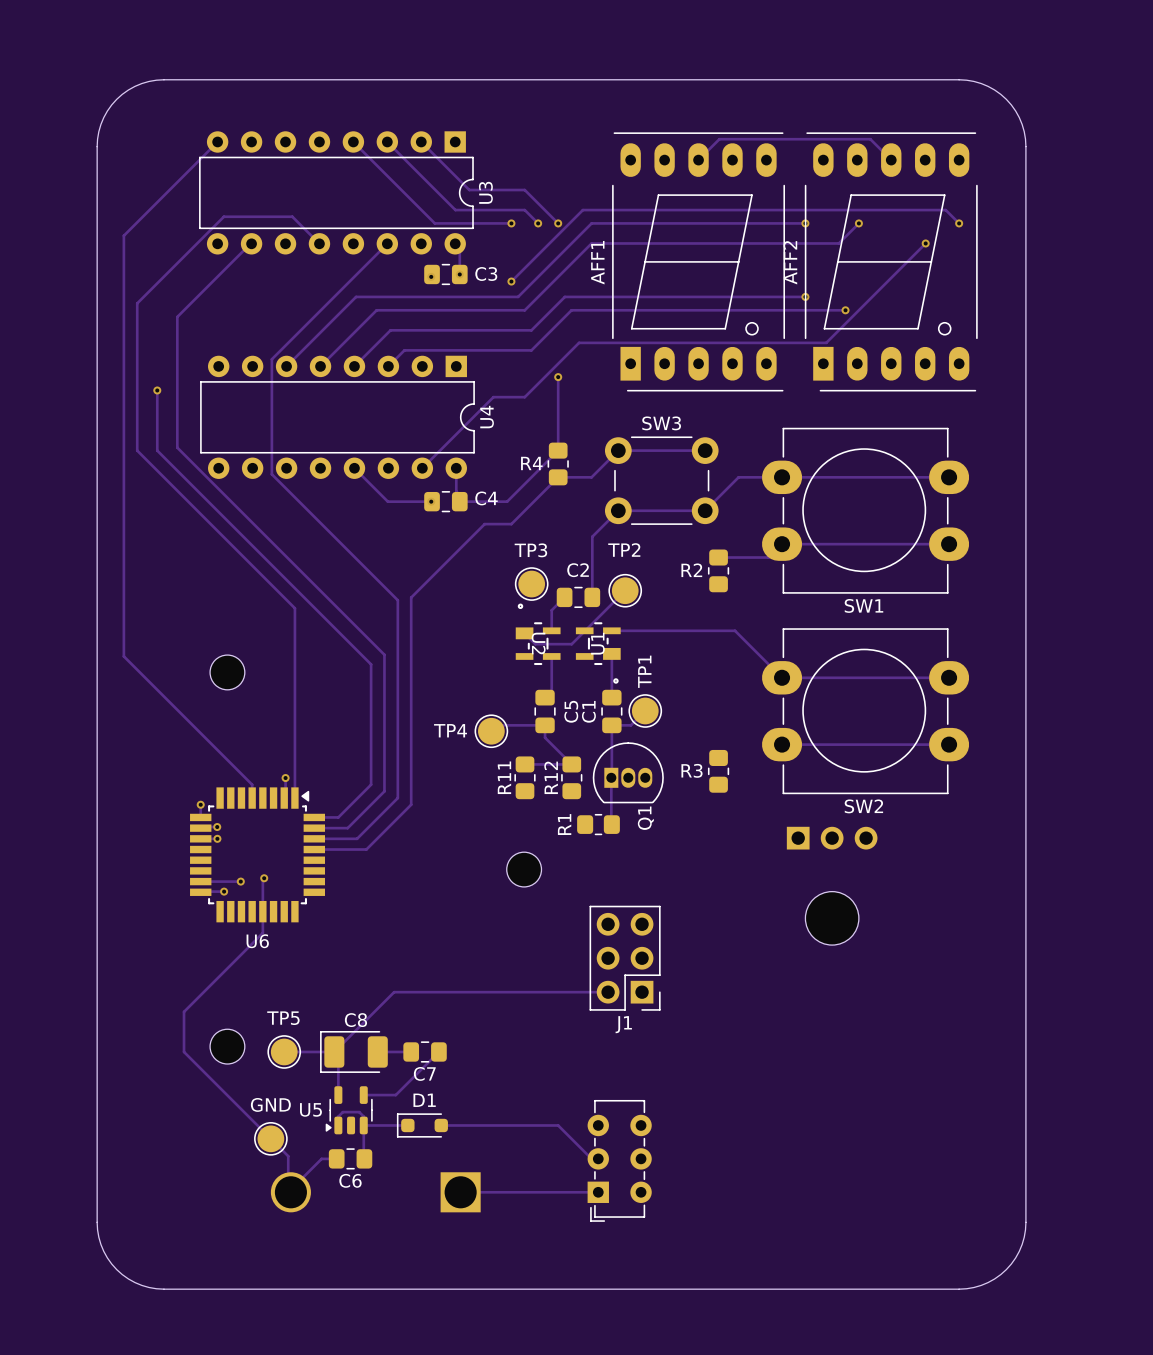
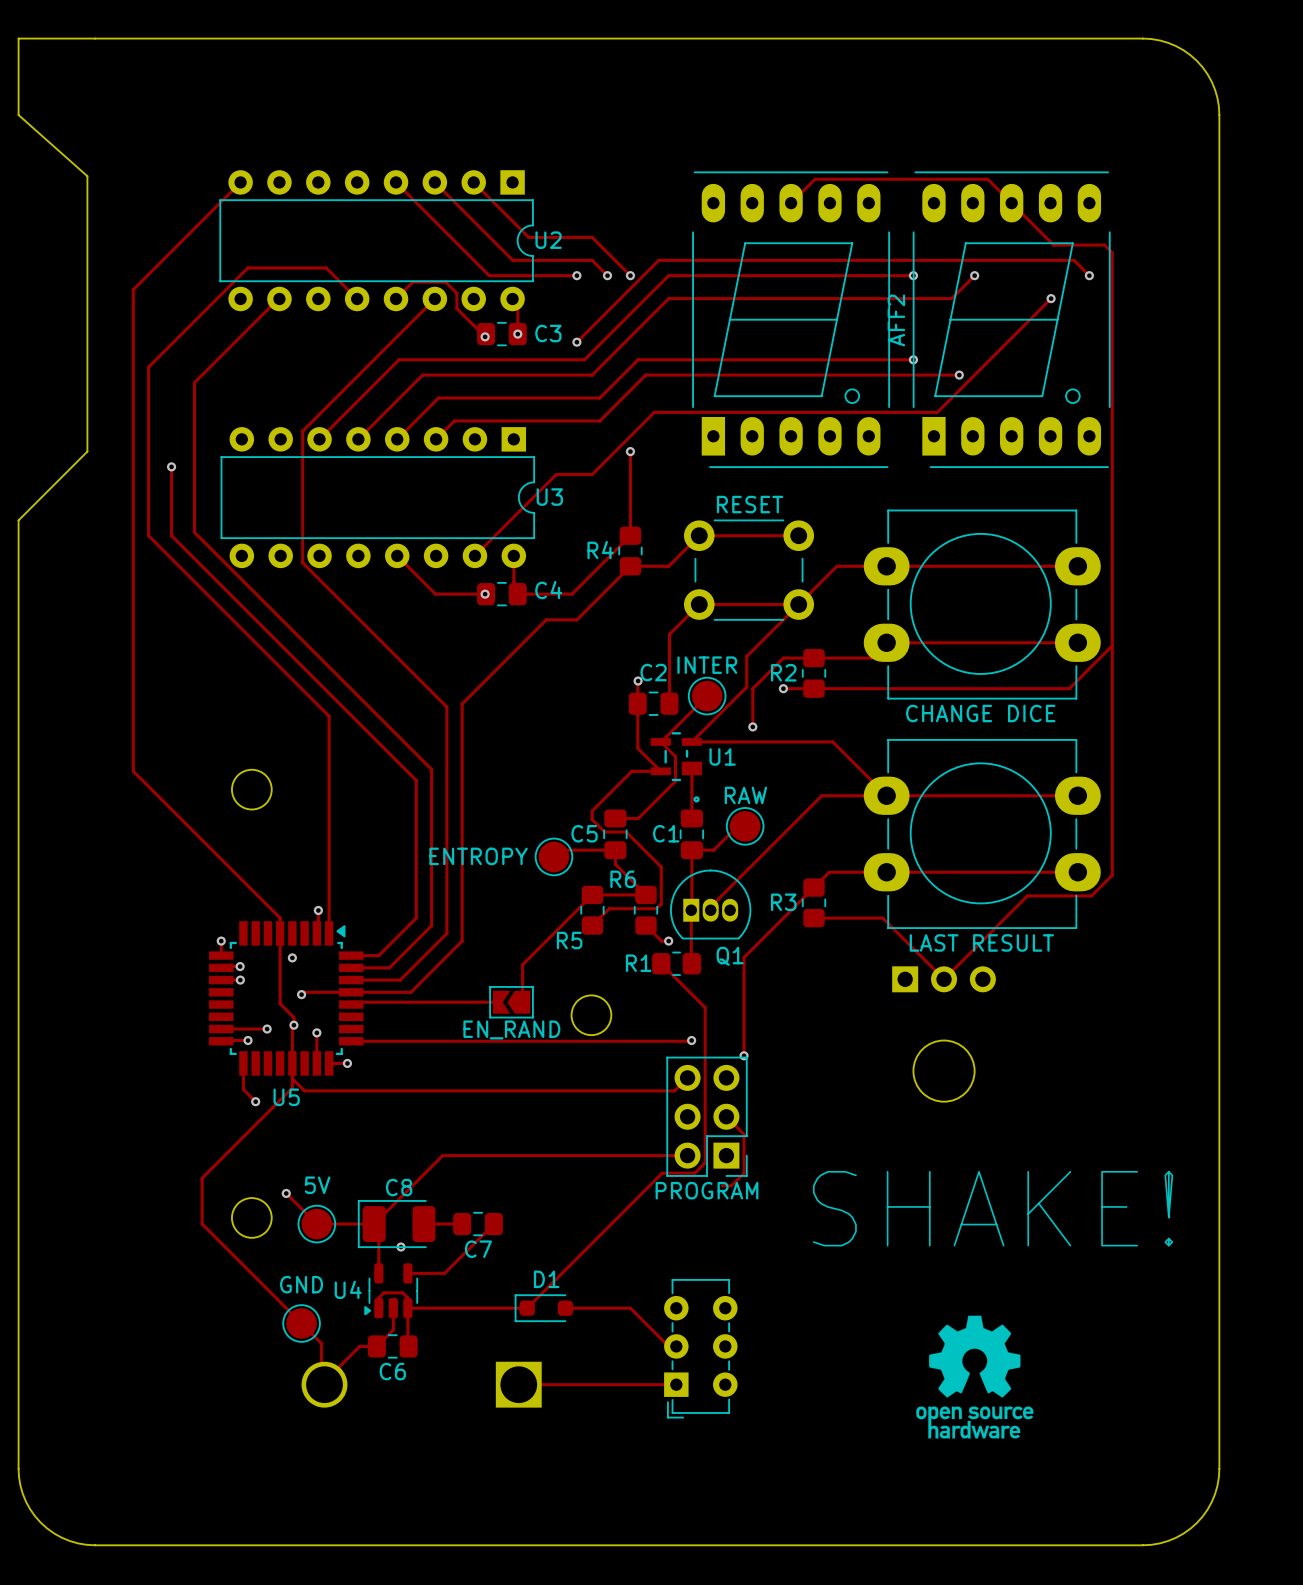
board edge: (163, 79) (959, 79) (973, 81) (988, 86) (1000, 94) (1015, 111) (1024, 131) (1025, 146) (1025, 1222) (1024, 1237) (1015, 1257) (1006, 1269) (994, 1278) (981, 1285) (959, 1289) (163, 1289) (149, 1287) (128, 1278) (116, 1269) (107, 1257) (100, 1244) (97, 1222) (97, 146) (100, 124) (107, 111) (116, 99) (134, 86) (149, 81) (163, 79) -> (18, 38) (18, 115) (87, 176) (87, 451) (18, 520) (18, 1468) (22, 1494) (35, 1516) (47, 1528) (61, 1537) (78, 1543) (95, 1545) (1142, 1545) (1168, 1541) (1190, 1528) (1202, 1516) (1211, 1502) (1217, 1485) (1219, 1468) (1219, 115) (1215, 89) (1202, 67) (1190, 55) (1176, 46) (1159, 40) (1142, 38) (18, 38)
track: none -> (1011, 203) (1053, 245) (1104, 245) (1112, 252) (1112, 875) (1091, 895) (1027, 895) (944, 979) (882, 918) (814, 918)
U3 name: U3 (485, 192) -> U2 (548, 240)
track: none -> (396, 298) (412, 282) (445, 282) (456, 293) (456, 308) (482, 334) (486, 334)
AFF1 name: AFF1 (597, 262) -> none
U4 name: U4 (487, 417) -> U3 (549, 497)
SW3 name: SW3 (661, 423) -> RESET (750, 504)
track: none -> (798, 604) (746, 656) (746, 687) (691, 741)
track: none -> (1112, 645) (1069, 688) (783, 688)
TP2 name: TP2 (624, 550) -> INTER (707, 665)
track: none -> (814, 658) (783, 658) (752, 688) (752, 726)
track: none -> (638, 681) (637, 748) (660, 771) (631, 771) (592, 811) (592, 819) (604, 832) (626, 832) (661, 867) (661, 903) (656, 908) (609, 908) (592, 925)
via: none -> (638, 681)
TP3: (531, 584) -> none
via: none -> (783, 688)
track: (564, 597) (551, 610) (551, 630) -> none
SW1 name: SW1 (863, 605) -> CHANGE DICE (980, 713)
via: none -> (752, 726)
track: (584, 630) (571, 644) (535, 644) (524, 633) -> none
U2: (538, 634) -> none
U1 name rotation: 0° (597, 643) -> 90° clockwise (722, 756)
U1 name position: U1 (597, 643) -> U1 (722, 756)
track: (551, 656) (551, 690) (545, 697) -> (660, 741) (675, 756) (675, 781) (638, 818) (615, 818)
track: none -> (886, 795) (821, 795) (710, 906) (710, 910)
RAW: none -> (745, 826)
TP1: (645, 710) -> none
C5 name rotation: 0° (571, 711) -> 90° clockwise (584, 833)
C5 name position: C5 (571, 711) -> C5 (584, 833)
C1 name rotation: 0° (588, 711) -> 90° clockwise (666, 833)
TP4 name: TP4 (450, 730) -> ENTROPY (478, 856)
track: none -> (886, 872) (829, 872) (744, 957) (744, 1055)
track: none -> (592, 894) (522, 964) (522, 1002)
R11 name: R11 (504, 777) -> R5 (569, 940)
R12 name: R12 (551, 777) -> R6 (623, 879)
track: none -> (645, 925) (661, 941) (668, 941)
track: none -> (280, 933) (280, 1003) (293, 1017) (293, 1025)
via: none -> (668, 941)
SW2 name: SW2 (863, 806) -> LAST RESULT (981, 942)
Q1 name rotation: 0° (645, 818) -> 90° clockwise (730, 956)
via: none -> (292, 957)
R1 name rotation: 0° (564, 824) -> 90° clockwise (638, 963)
track: none -> (351, 992) (303, 992) (301, 994)
via: none -> (301, 994)
track: none -> (500, 1002) (353, 1002) (351, 1004)
EN_RAND: none -> (511, 1002)
track: none -> (316, 1032) (316, 1063)
via: none -> (316, 1032)
track: none -> (691, 1040) (351, 1041)
via: none -> (691, 1040)
via: none -> (744, 1055)
track: none -> (243, 1063) (243, 1089) (255, 1101)
track: none -> (329, 1063) (347, 1063)
via: none -> (347, 1063)
track: none -> (687, 1077) (674, 1090) (304, 1090) (292, 1078)
U6 name: U6 (257, 941) -> U5 (286, 1097)
via: none -> (255, 1101)
track: none -> (726, 1116) (744, 1134) (744, 1173) (731, 1185) (722, 1185)
TP5 name: TP5 (283, 1018) -> 5V (317, 1185)
J1 name: J1 (623, 1024) -> PROGRAM (707, 1190)
track: none -> (286, 1193) (316, 1224)
via: none -> (286, 1193)
text: none -> SHAKE! (993, 1208)
via: none -> (400, 1247)
U5 name: U5 (310, 1109) -> U4 (348, 1289)
track: none -> (393, 1308) (393, 1329) (376, 1346)
track: none -> (458, 1308) (496, 1308)
D1 position: (422, 1125) -> (543, 1308)
track: (467, 1125) (501, 1125) -> (527, 1308) (662, 1173) (694, 1173) (705, 1162) (705, 1007) (661, 963)
drawing: none -> [916, 1315, 1034, 1439]

